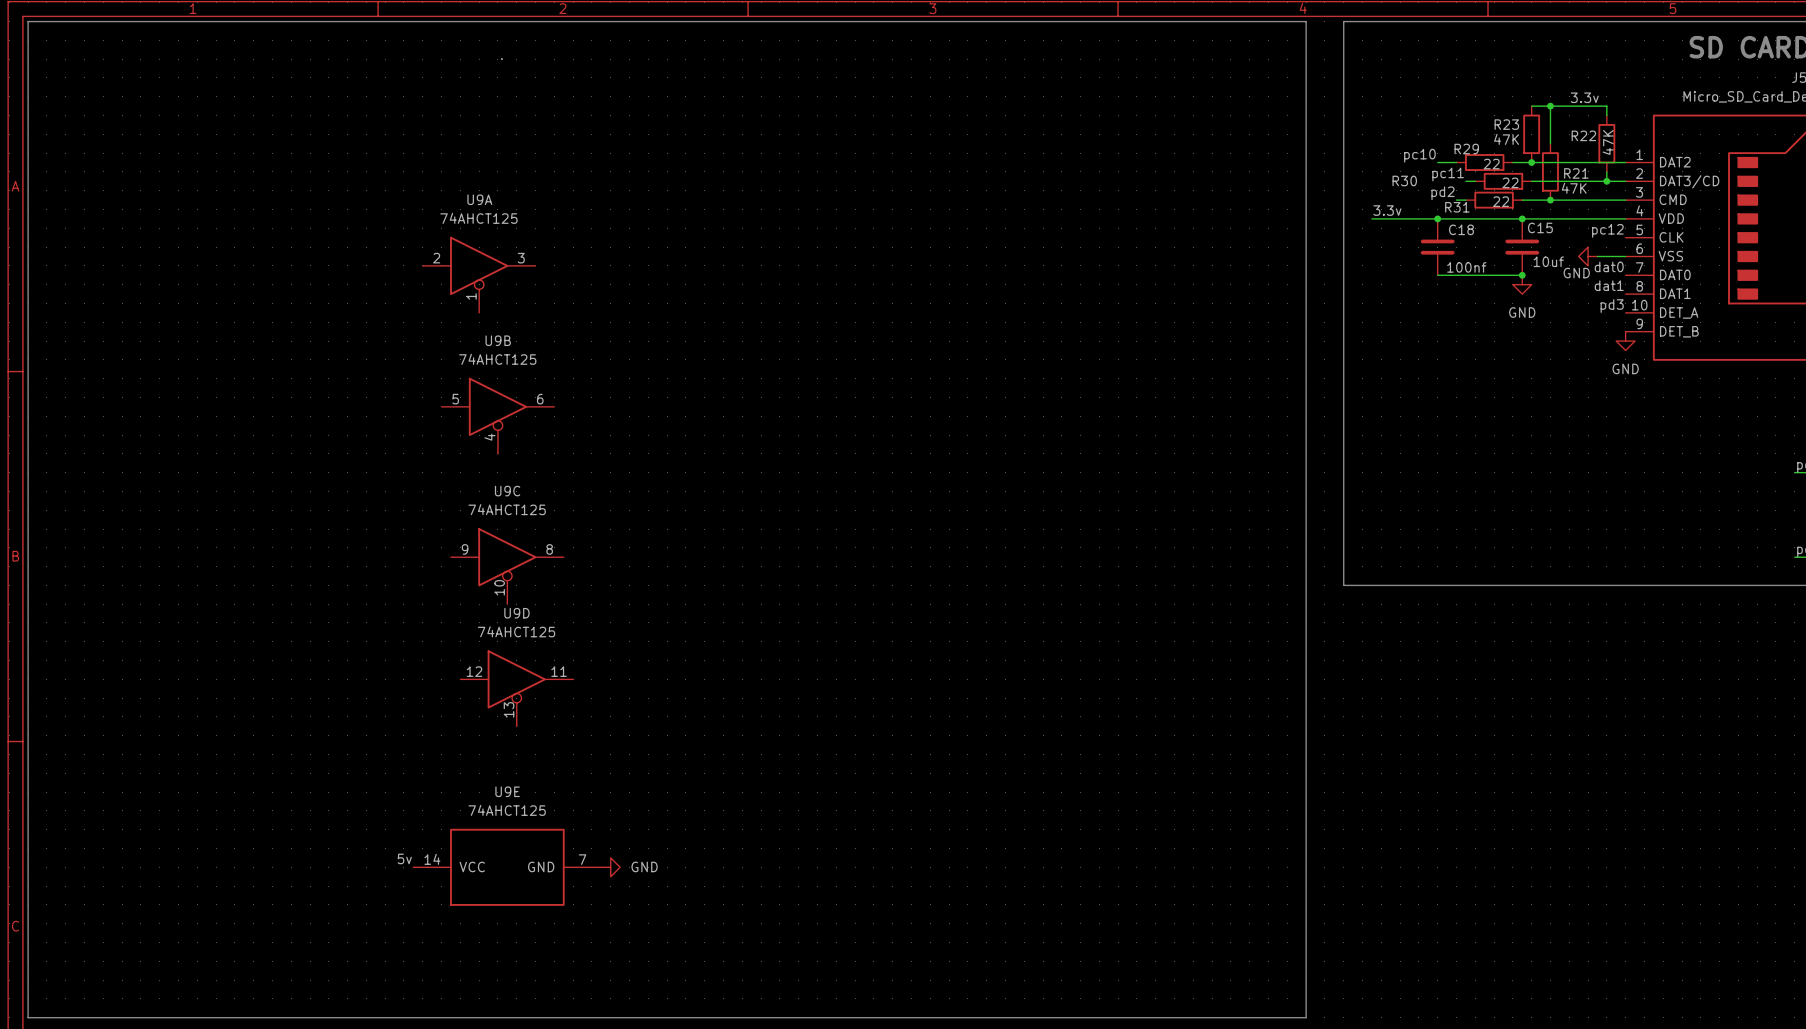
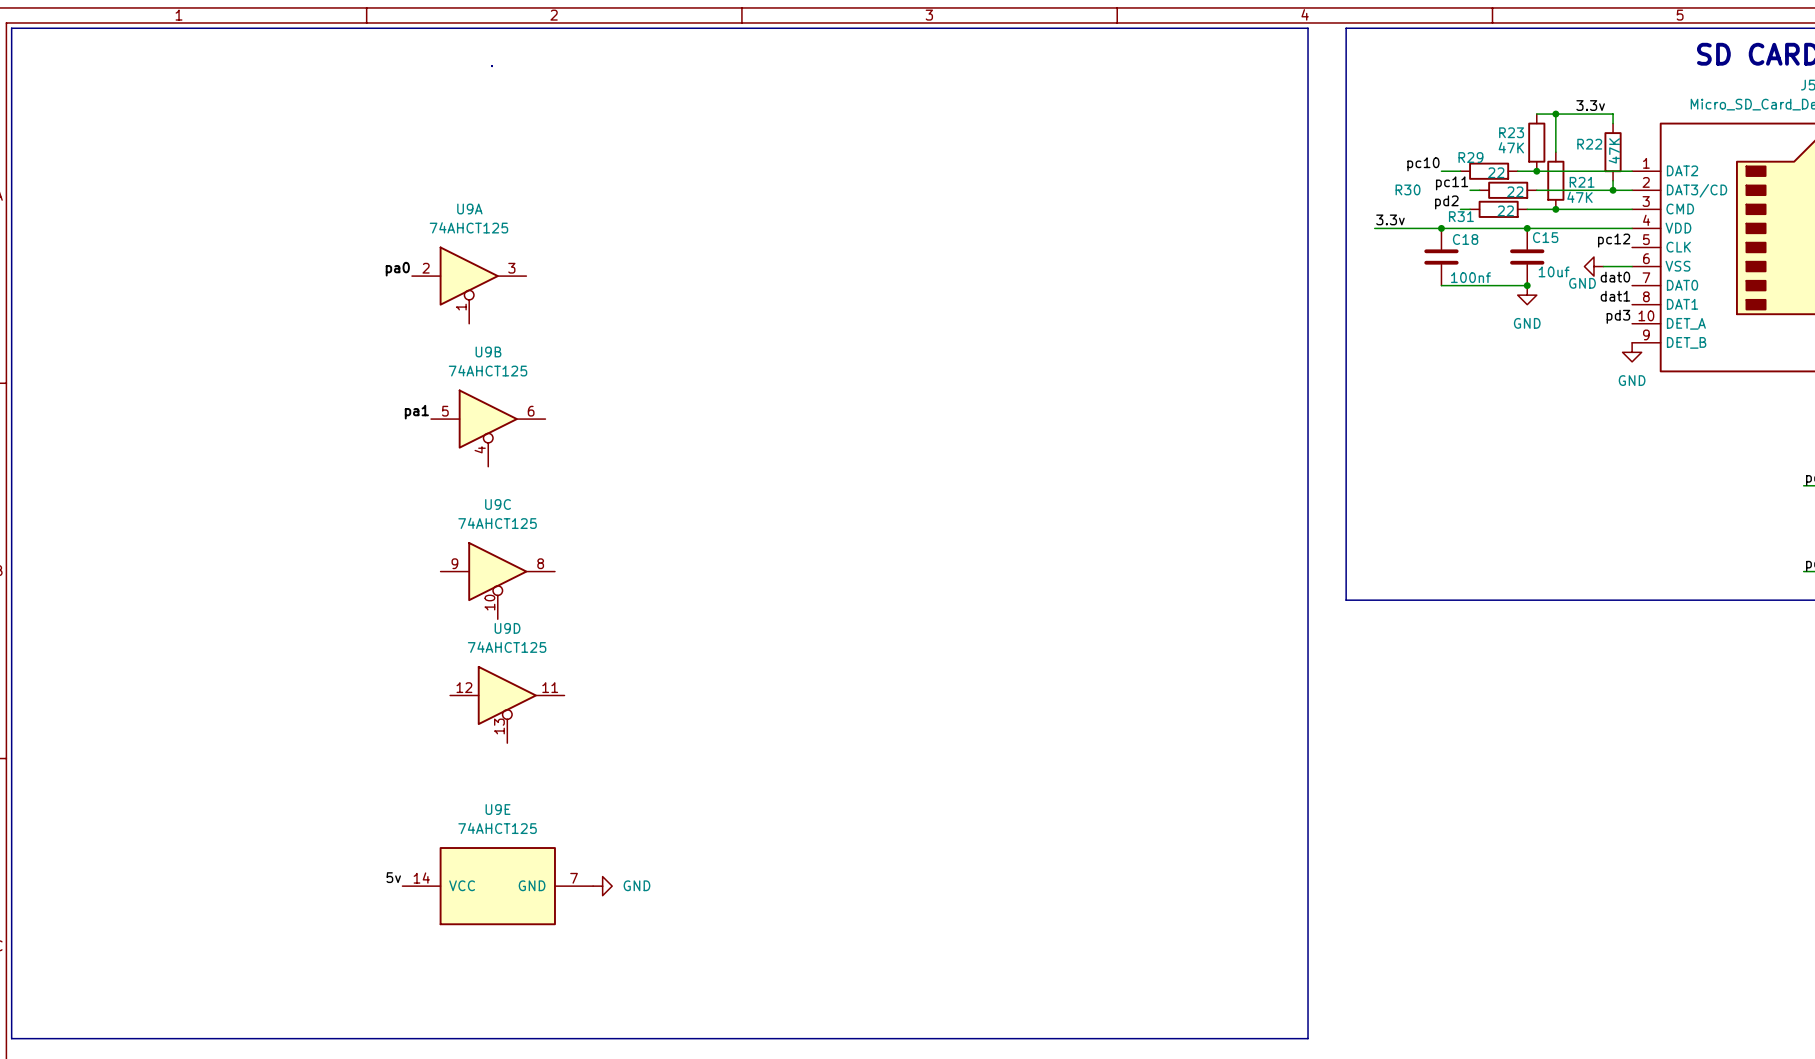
label: none -> pa0 (397, 269)
label: none -> pa1 (416, 412)

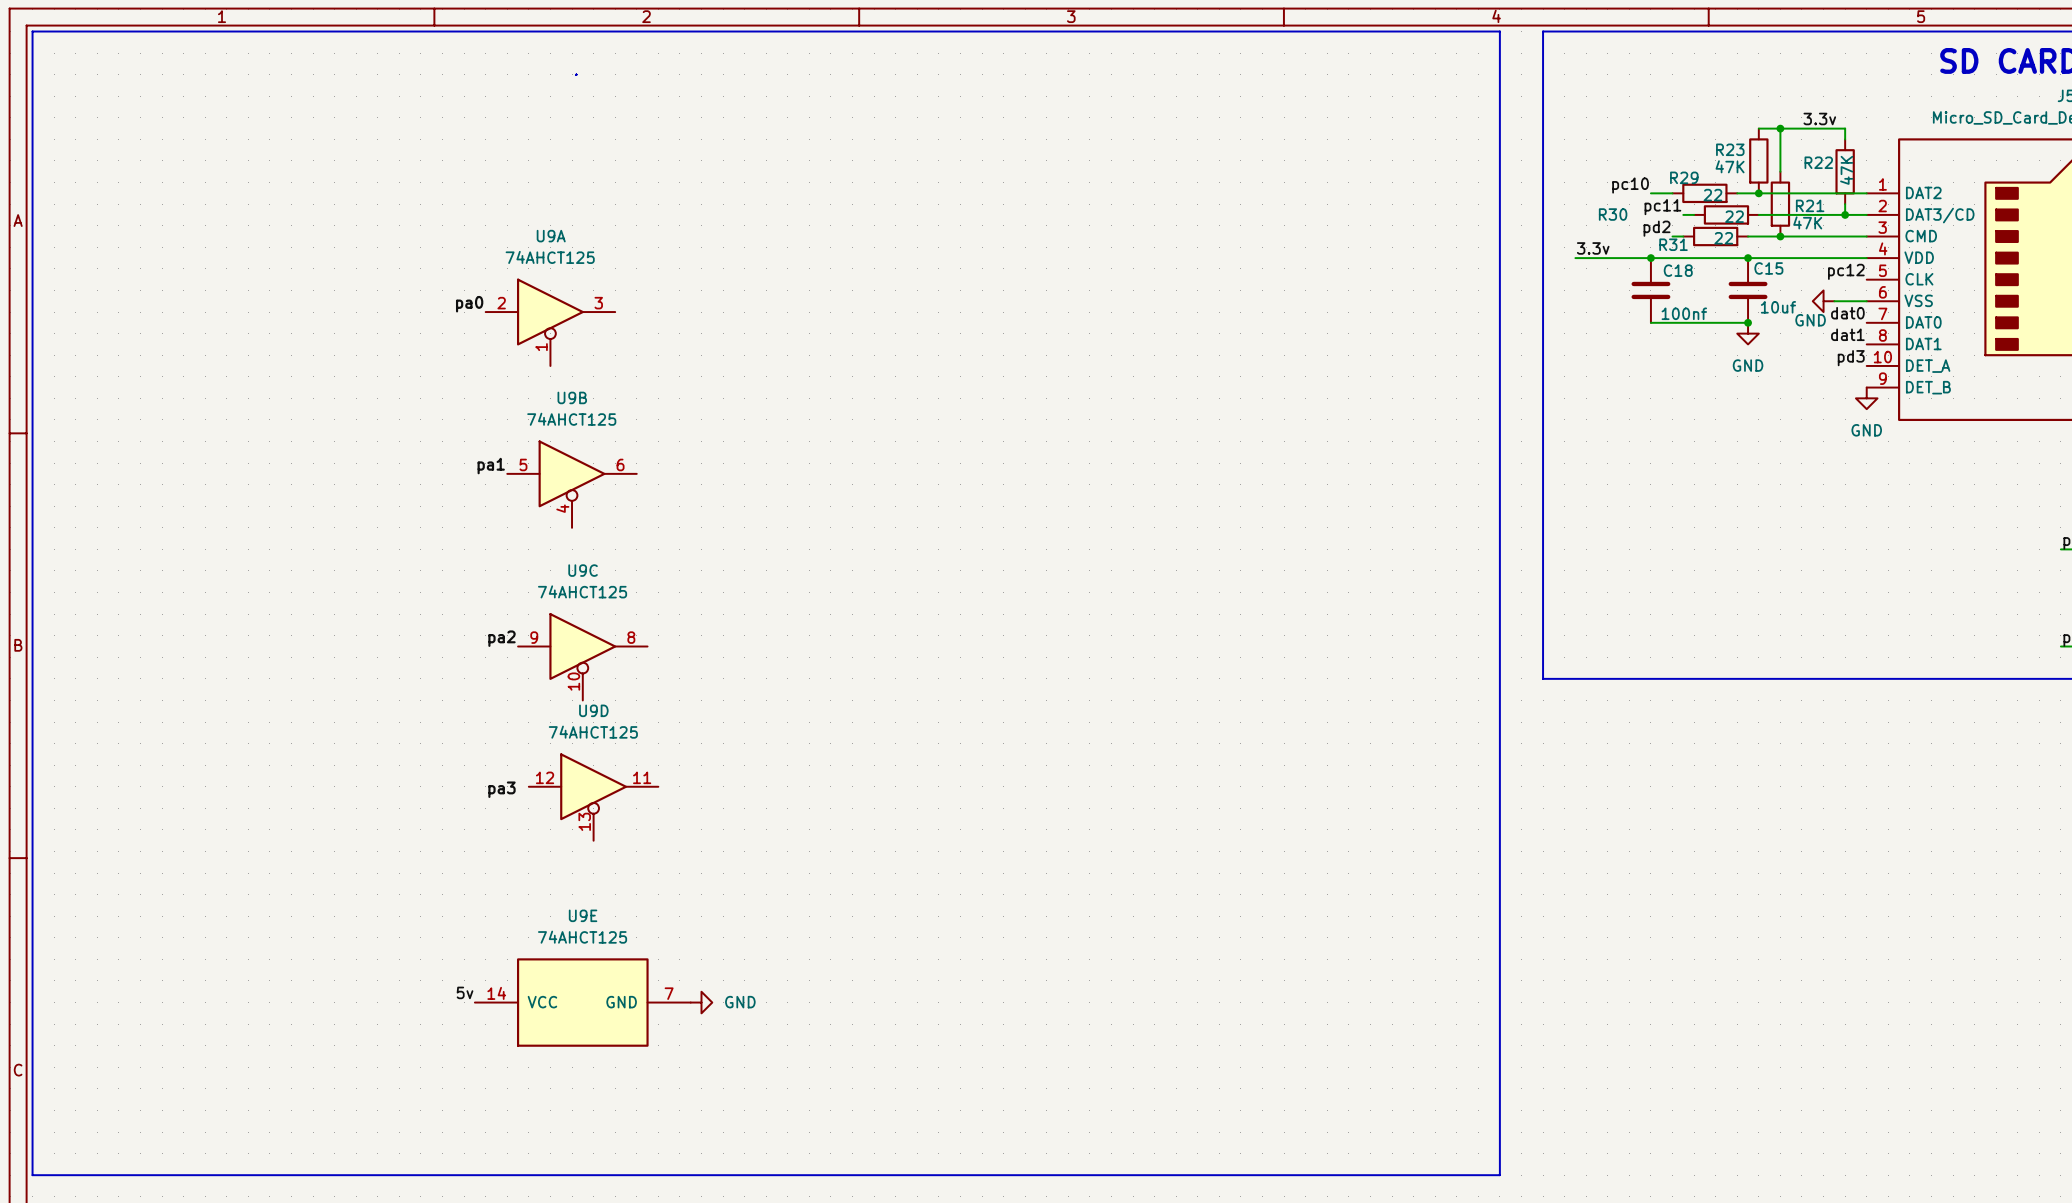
label: none -> pa2 (502, 638)
label: none -> pa3 (502, 789)

